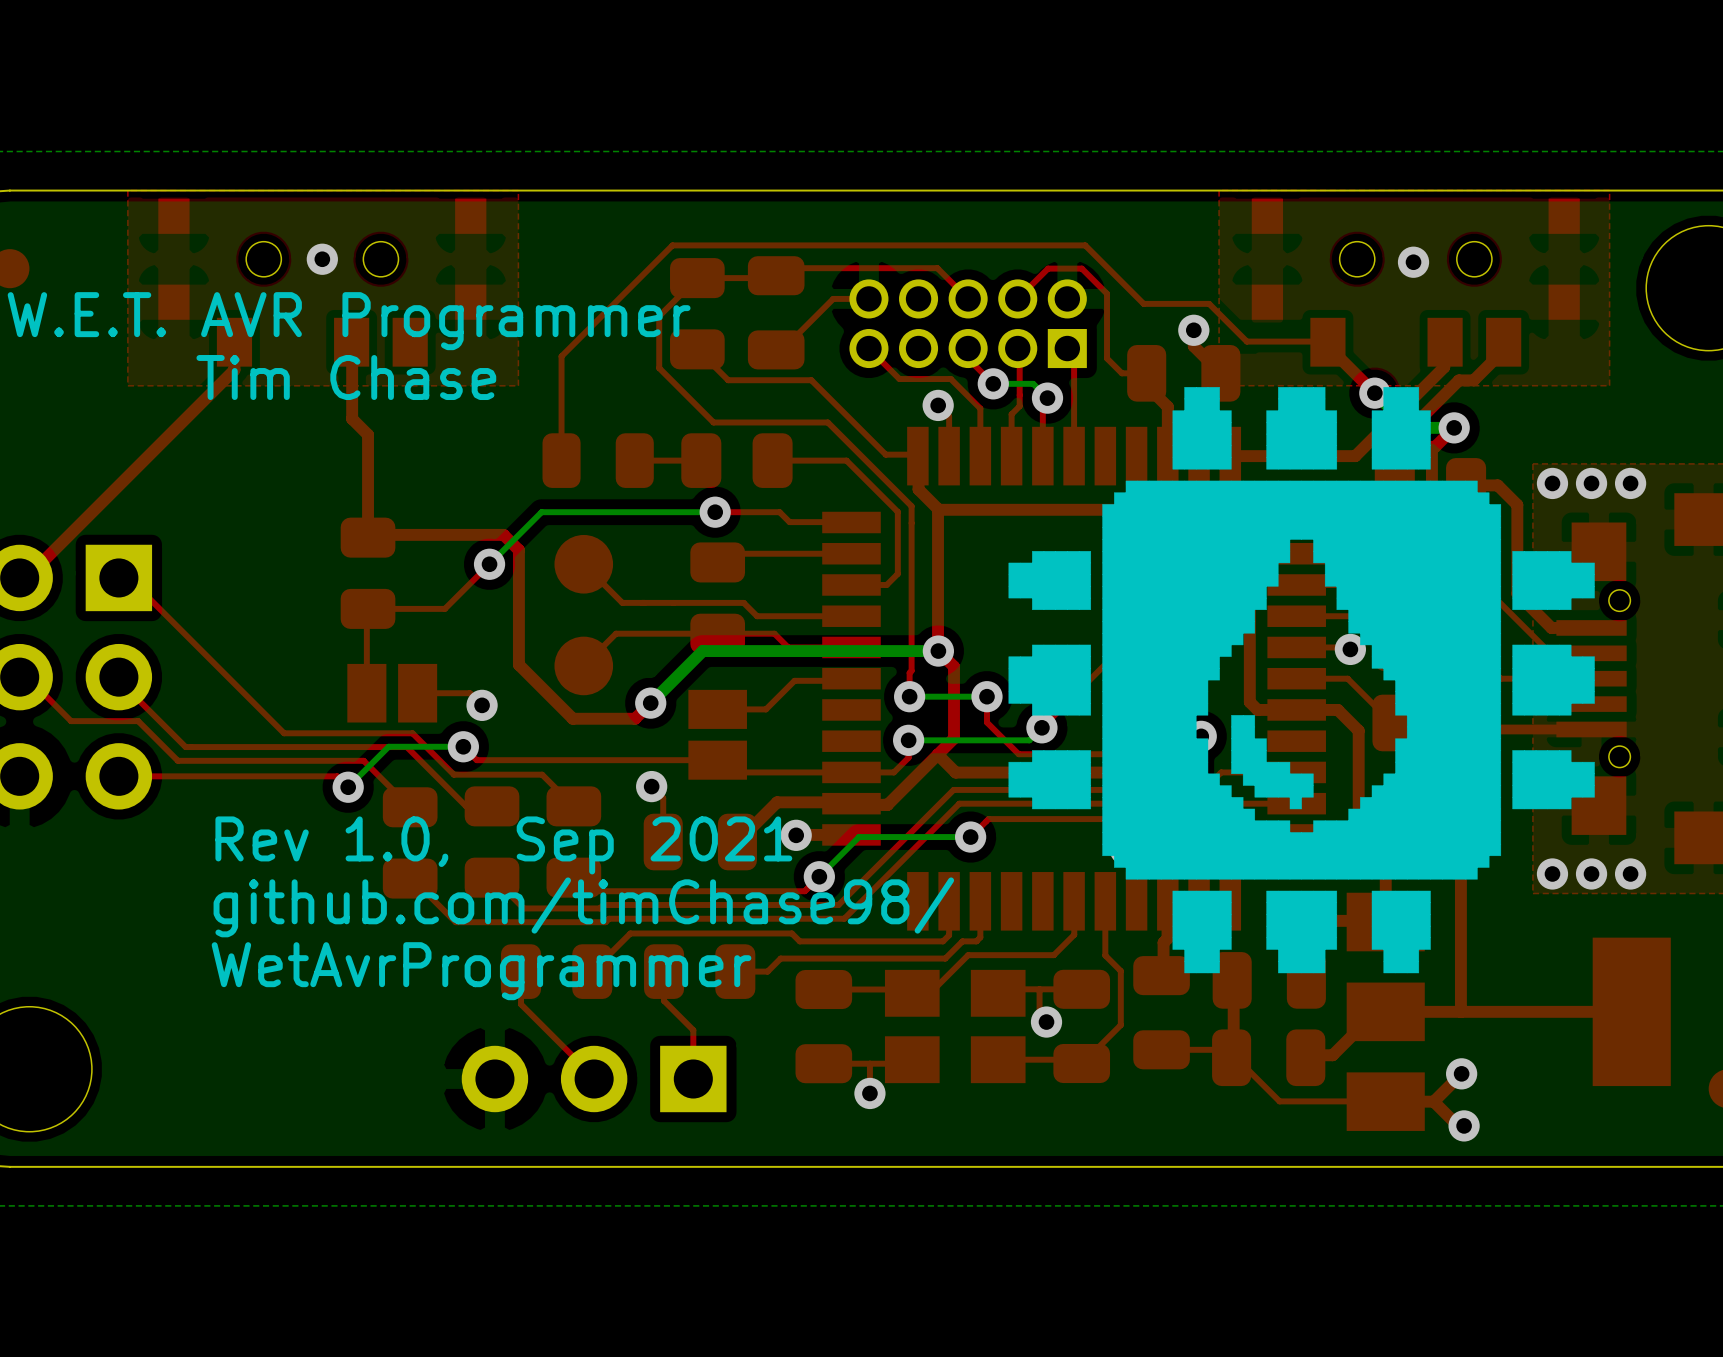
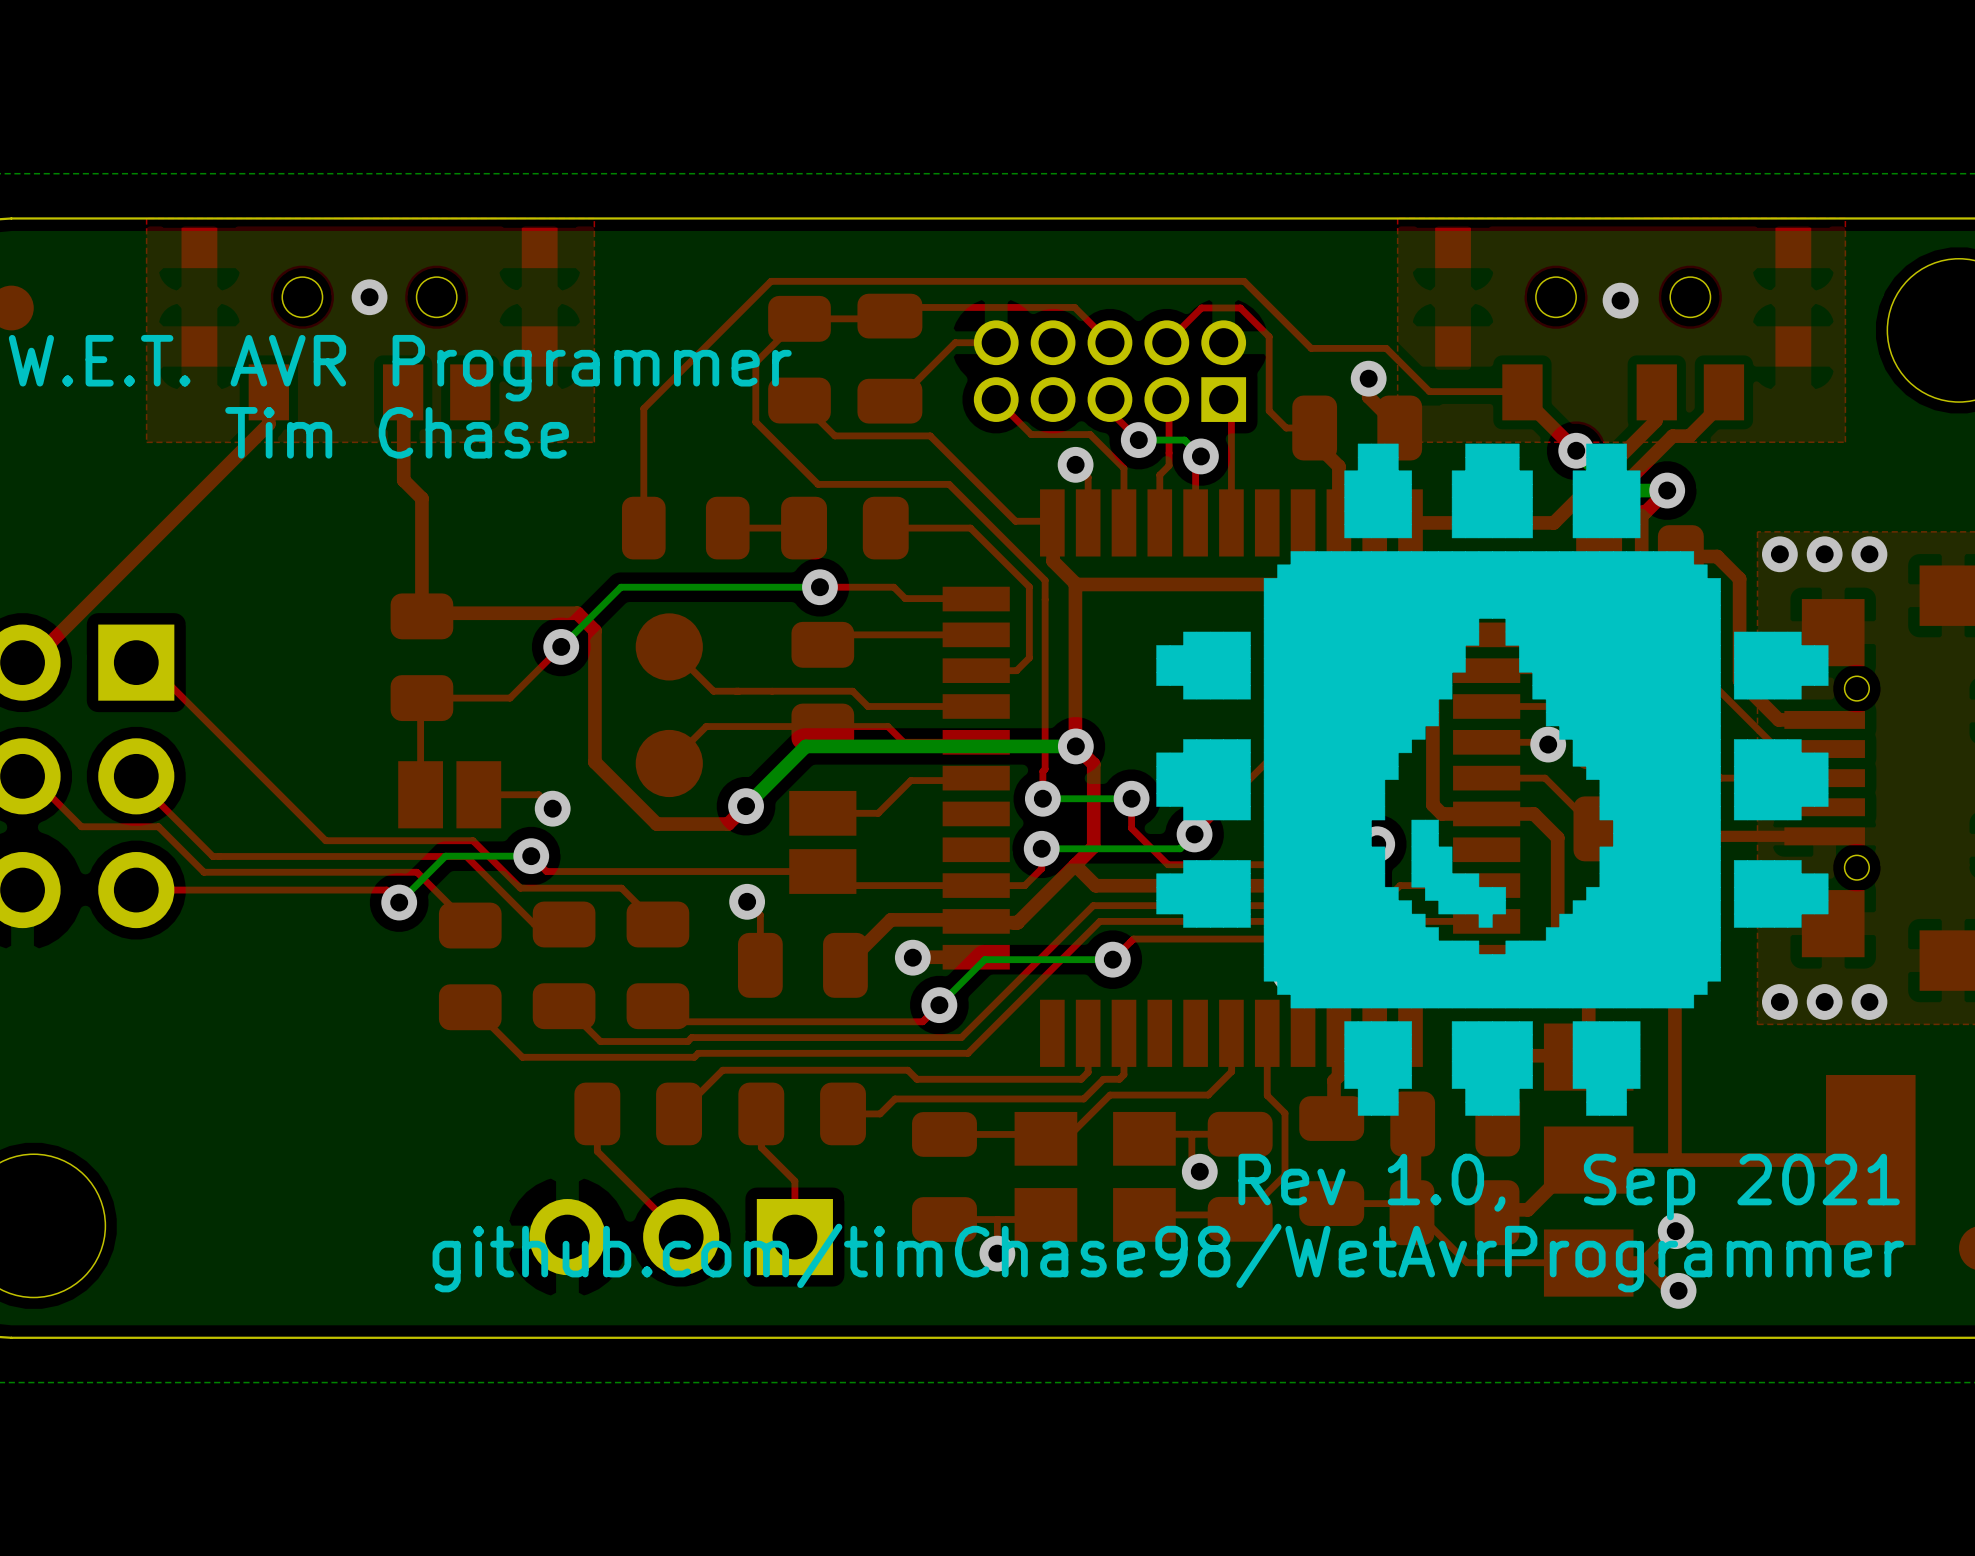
text: Rev 1.0, Sep 2021 (503, 845) -> none
text: github.com/timChase98/ (583, 907) -> none
text: WetAvrProgrammer (481, 971) -> none
text: none -> Rev 1.0, Sep 2021 (1569, 1186)
text: none -> github.com/timChase98/WetAvrProgrammer (1168, 1258)

